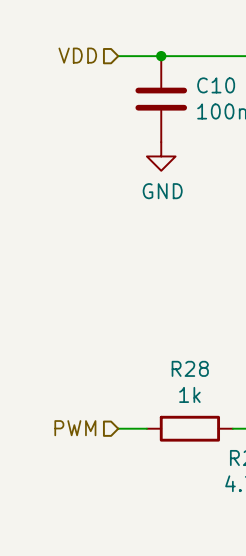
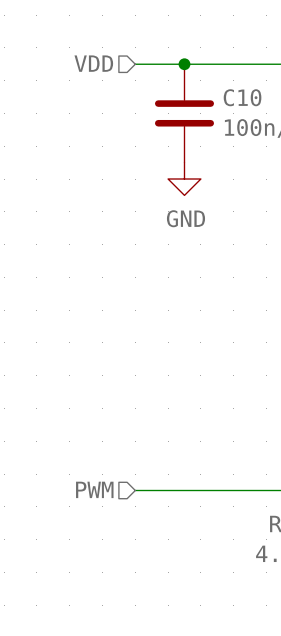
wire: none -> (168, 490) (266, 490)
R28: 1k (189, 428) -> none

